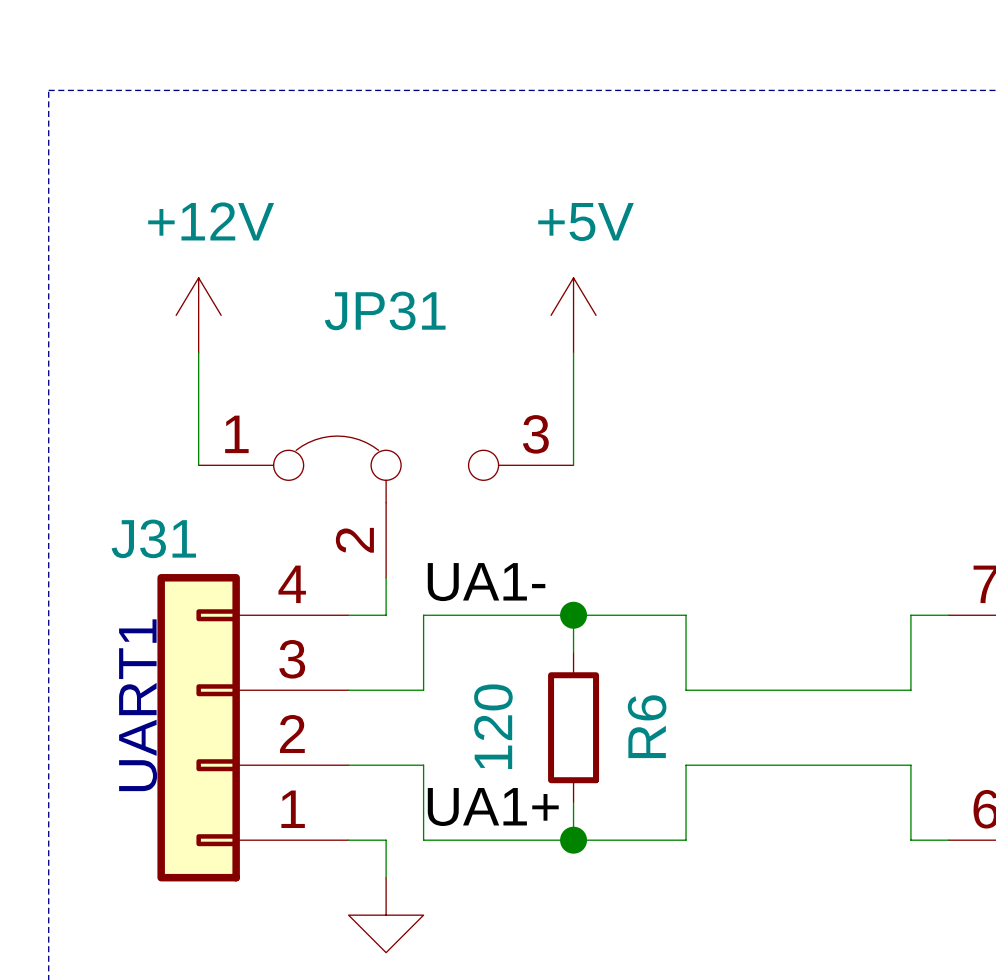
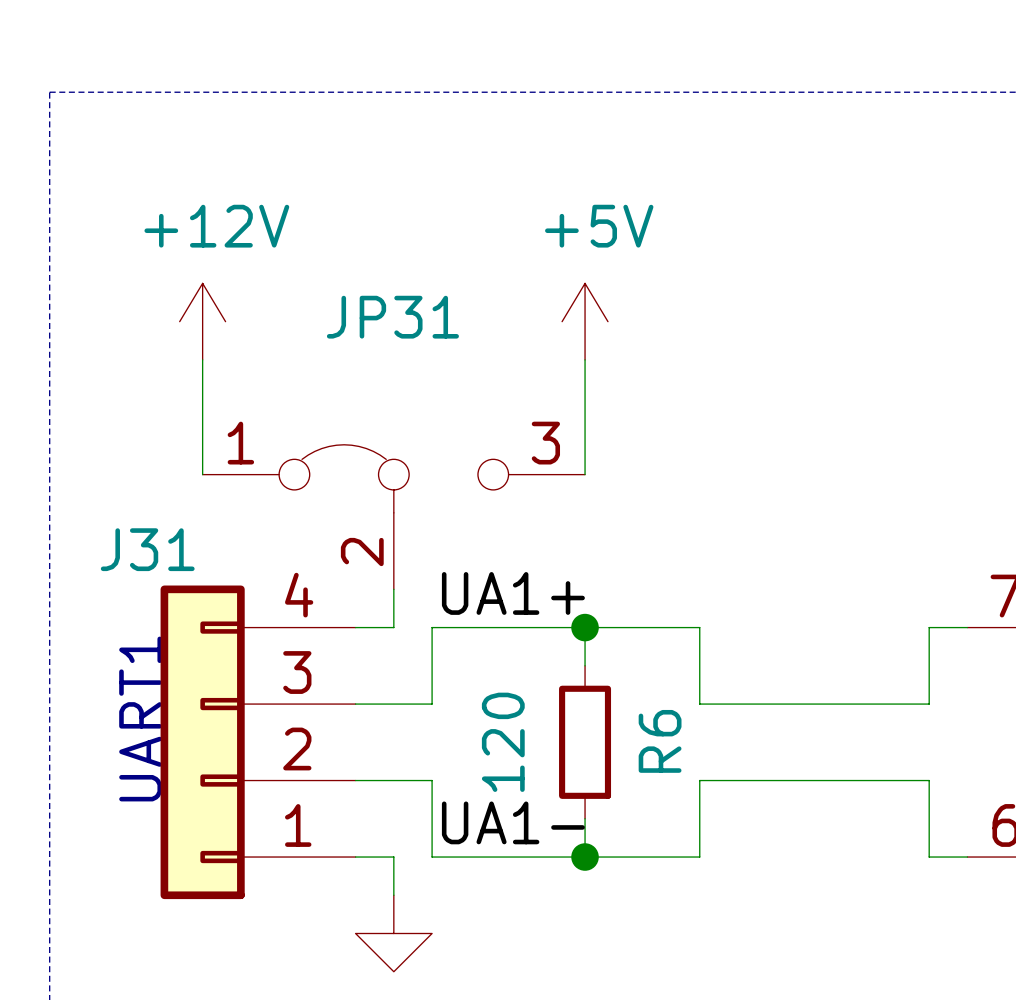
label: UA1- (486, 582) -> UA1+ (513, 593)
label: UA1+ (493, 807) -> UA1- (513, 822)

